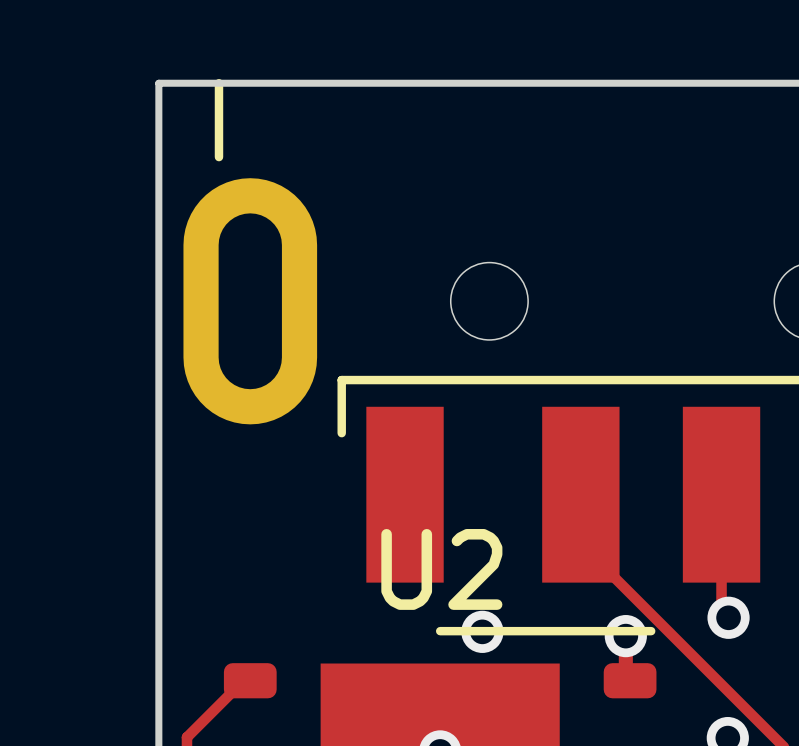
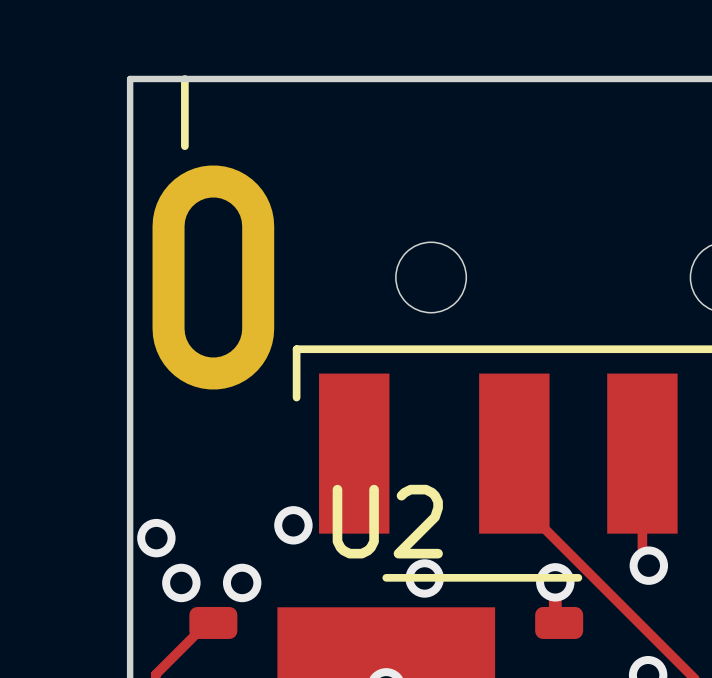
via: none -> (293, 525)
via: none -> (156, 538)
via: none -> (181, 582)
via: none -> (242, 582)

